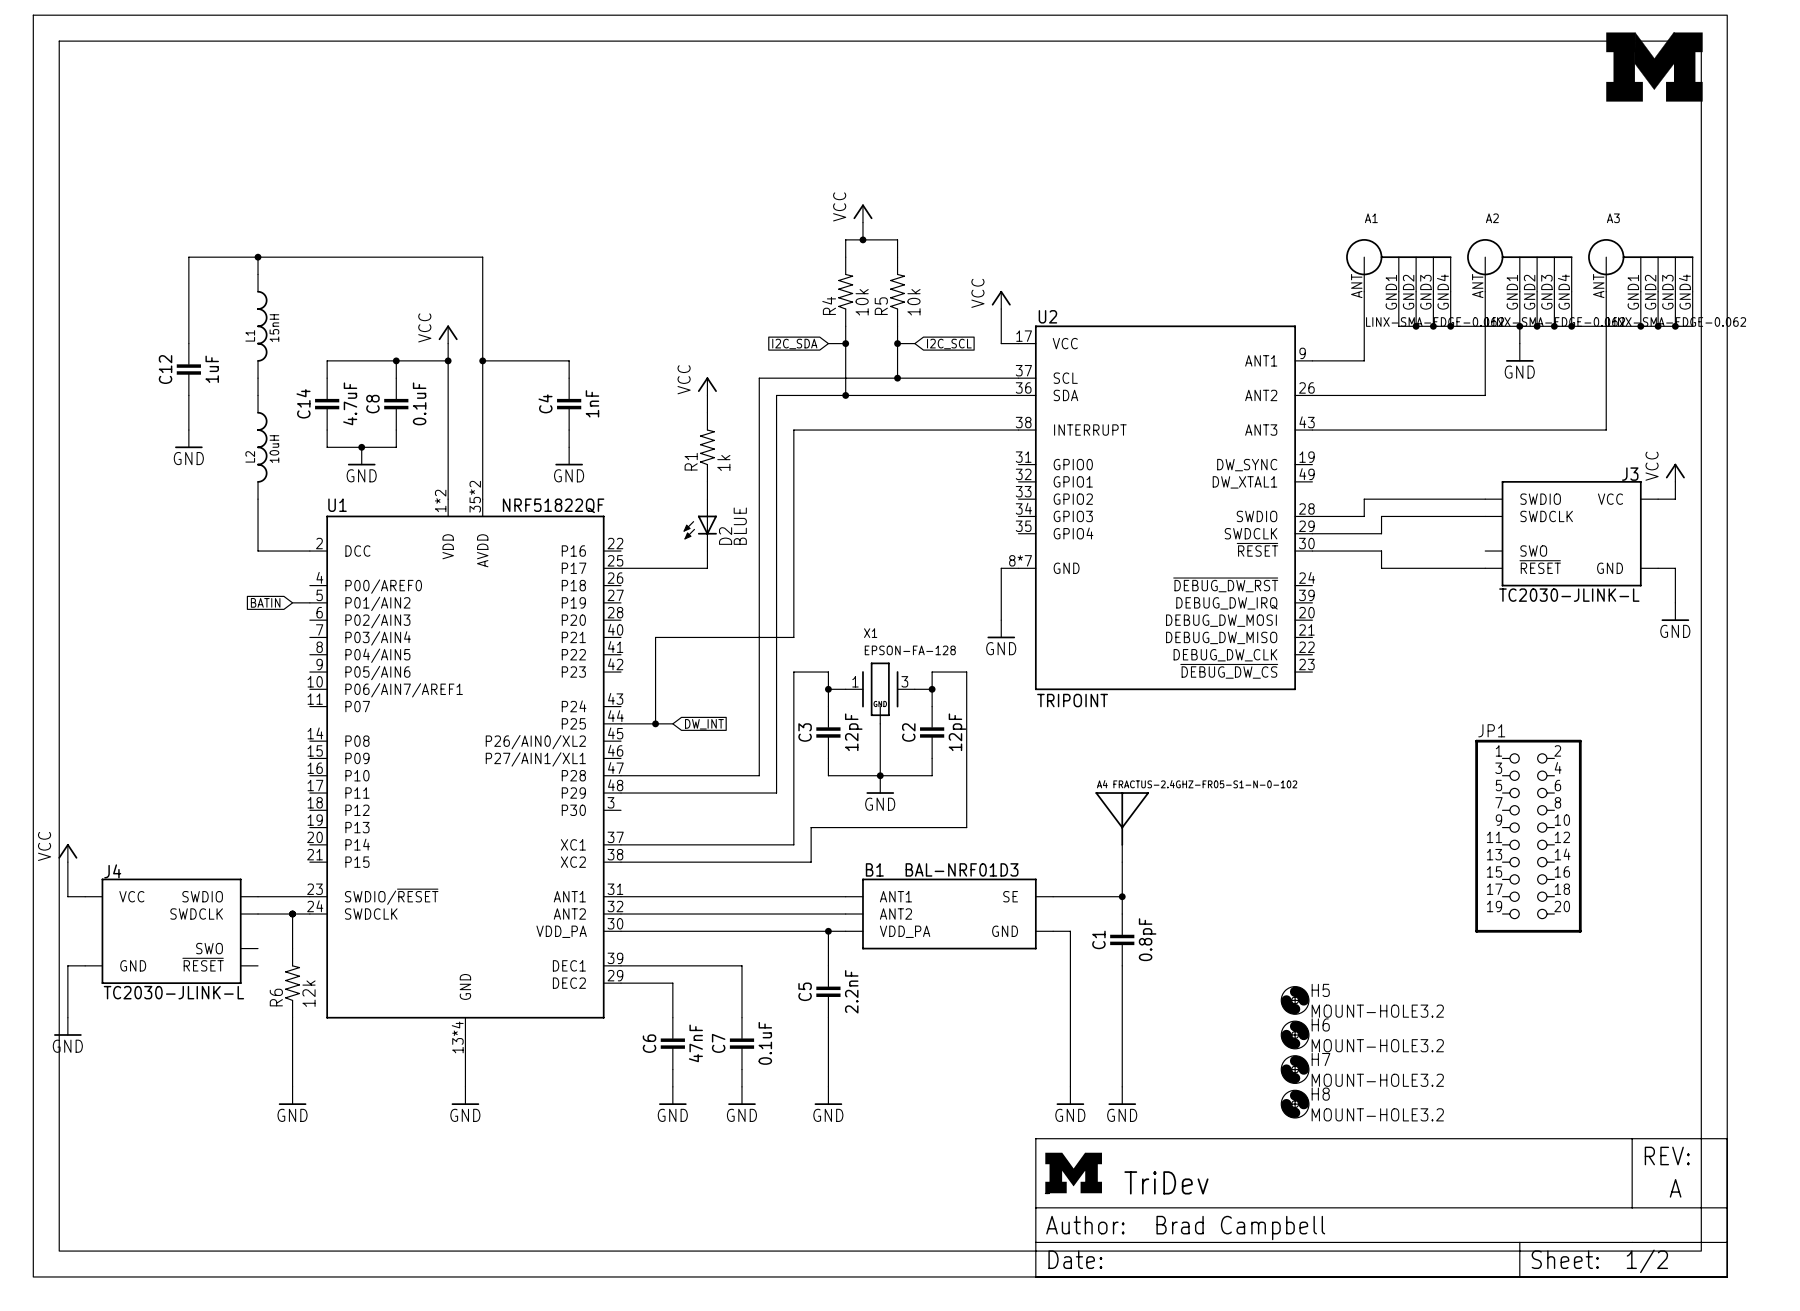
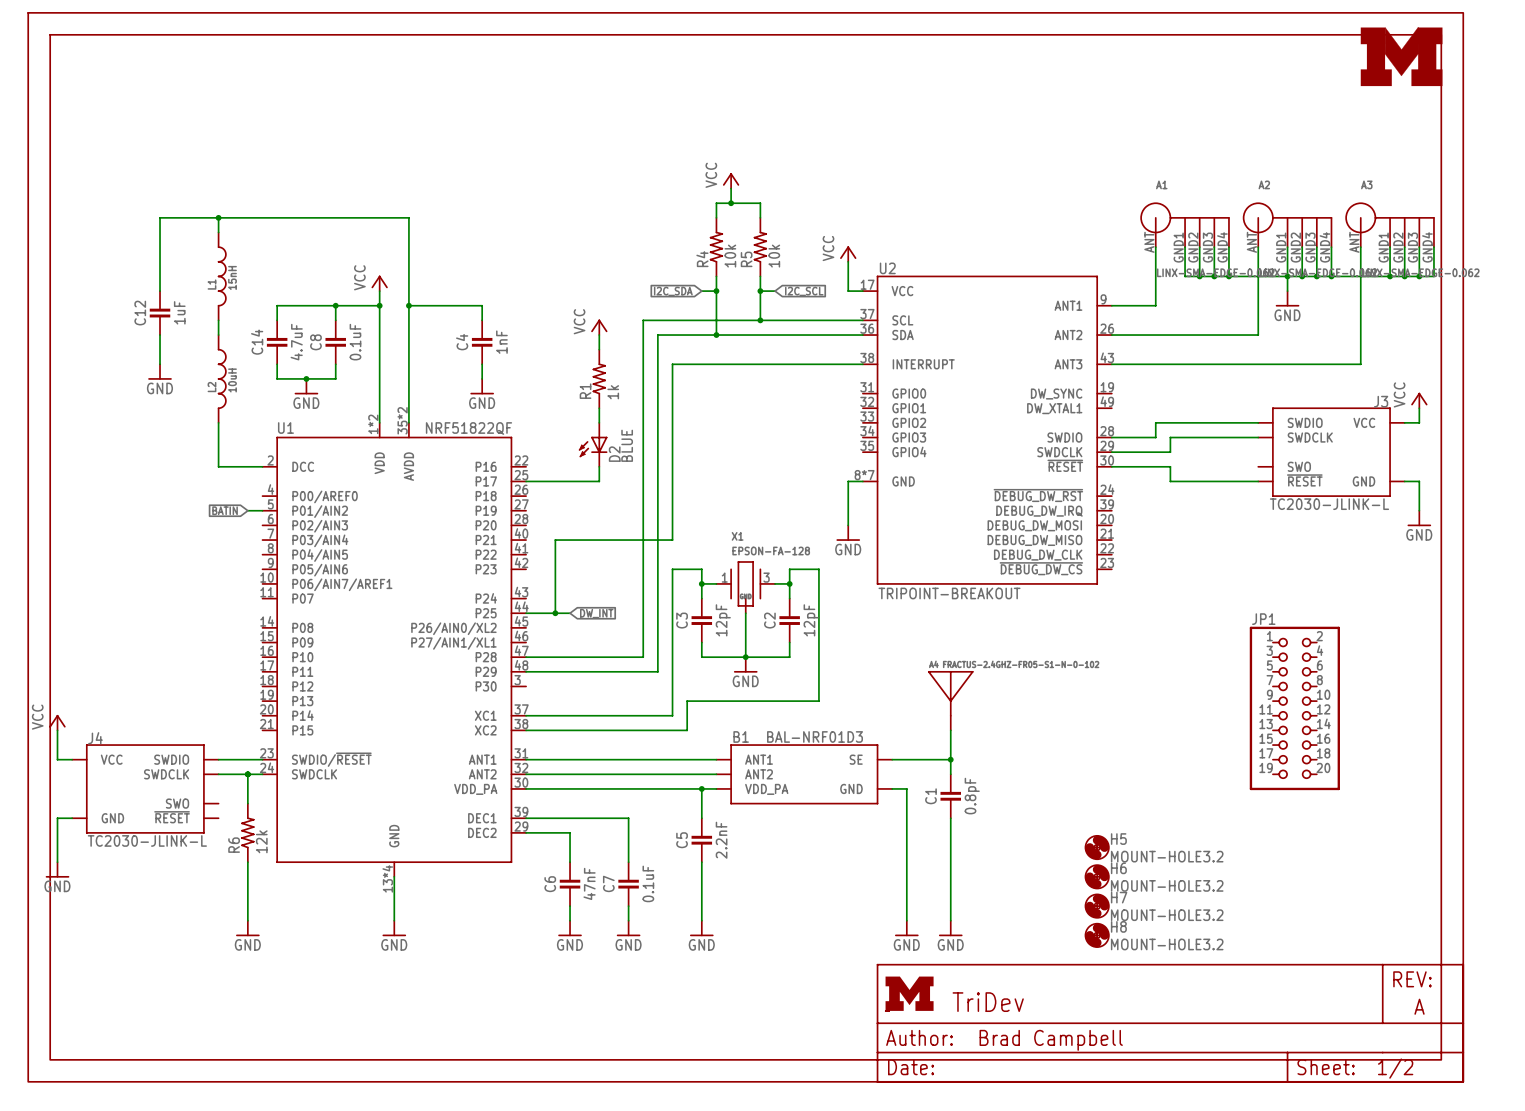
U2 value: TRIPOINT (1072, 700) -> TRIPOINT-BREAKOUT (949, 593)

